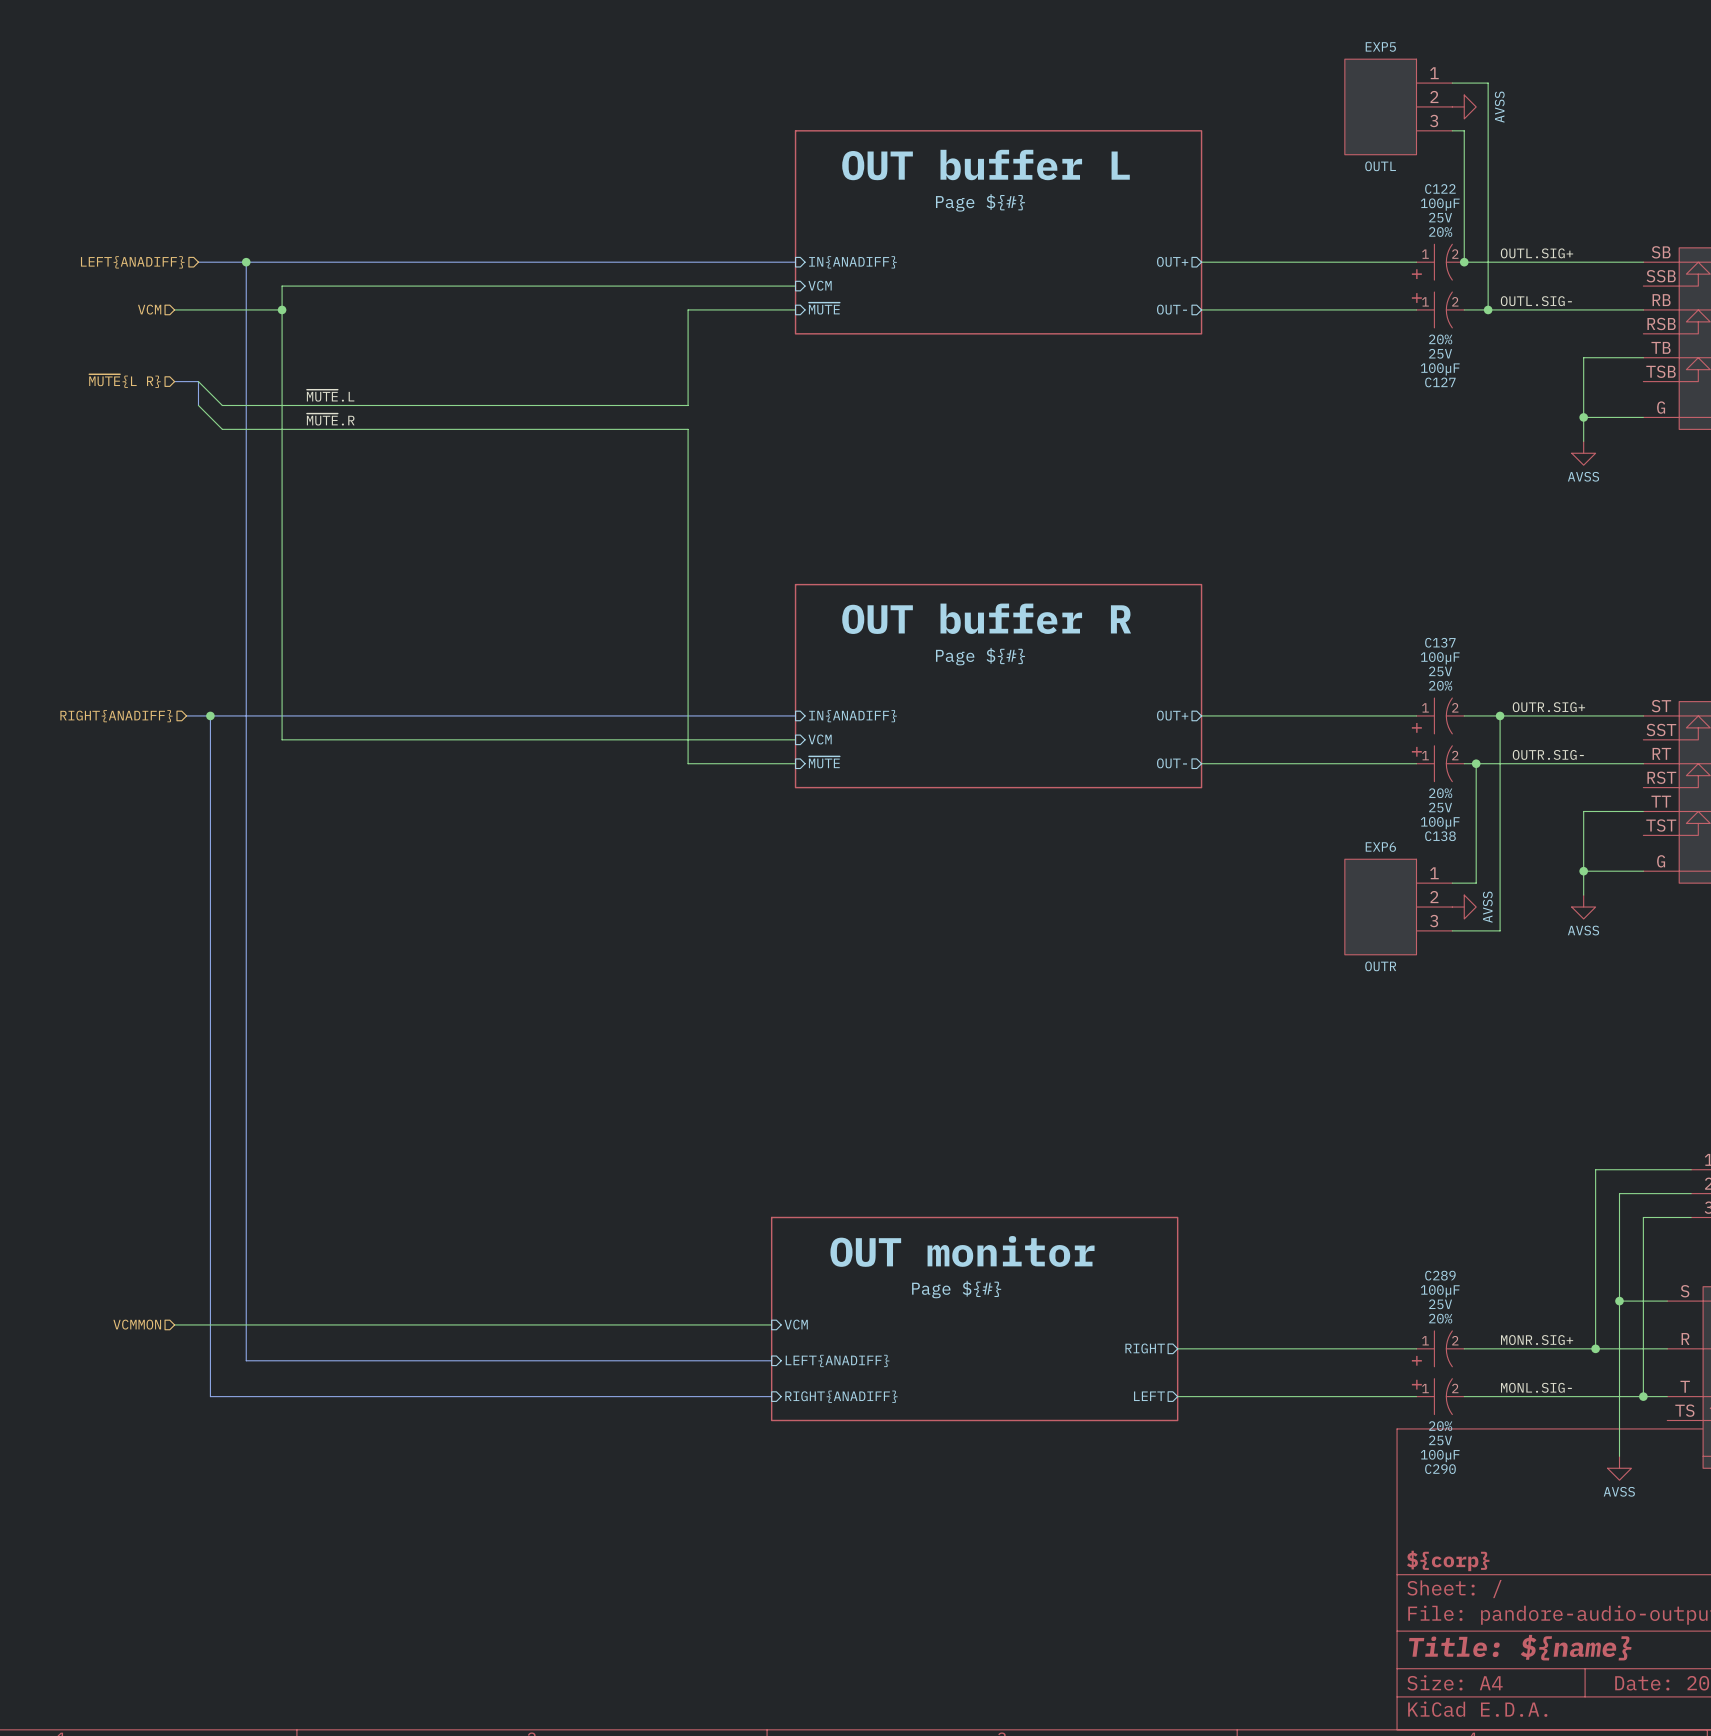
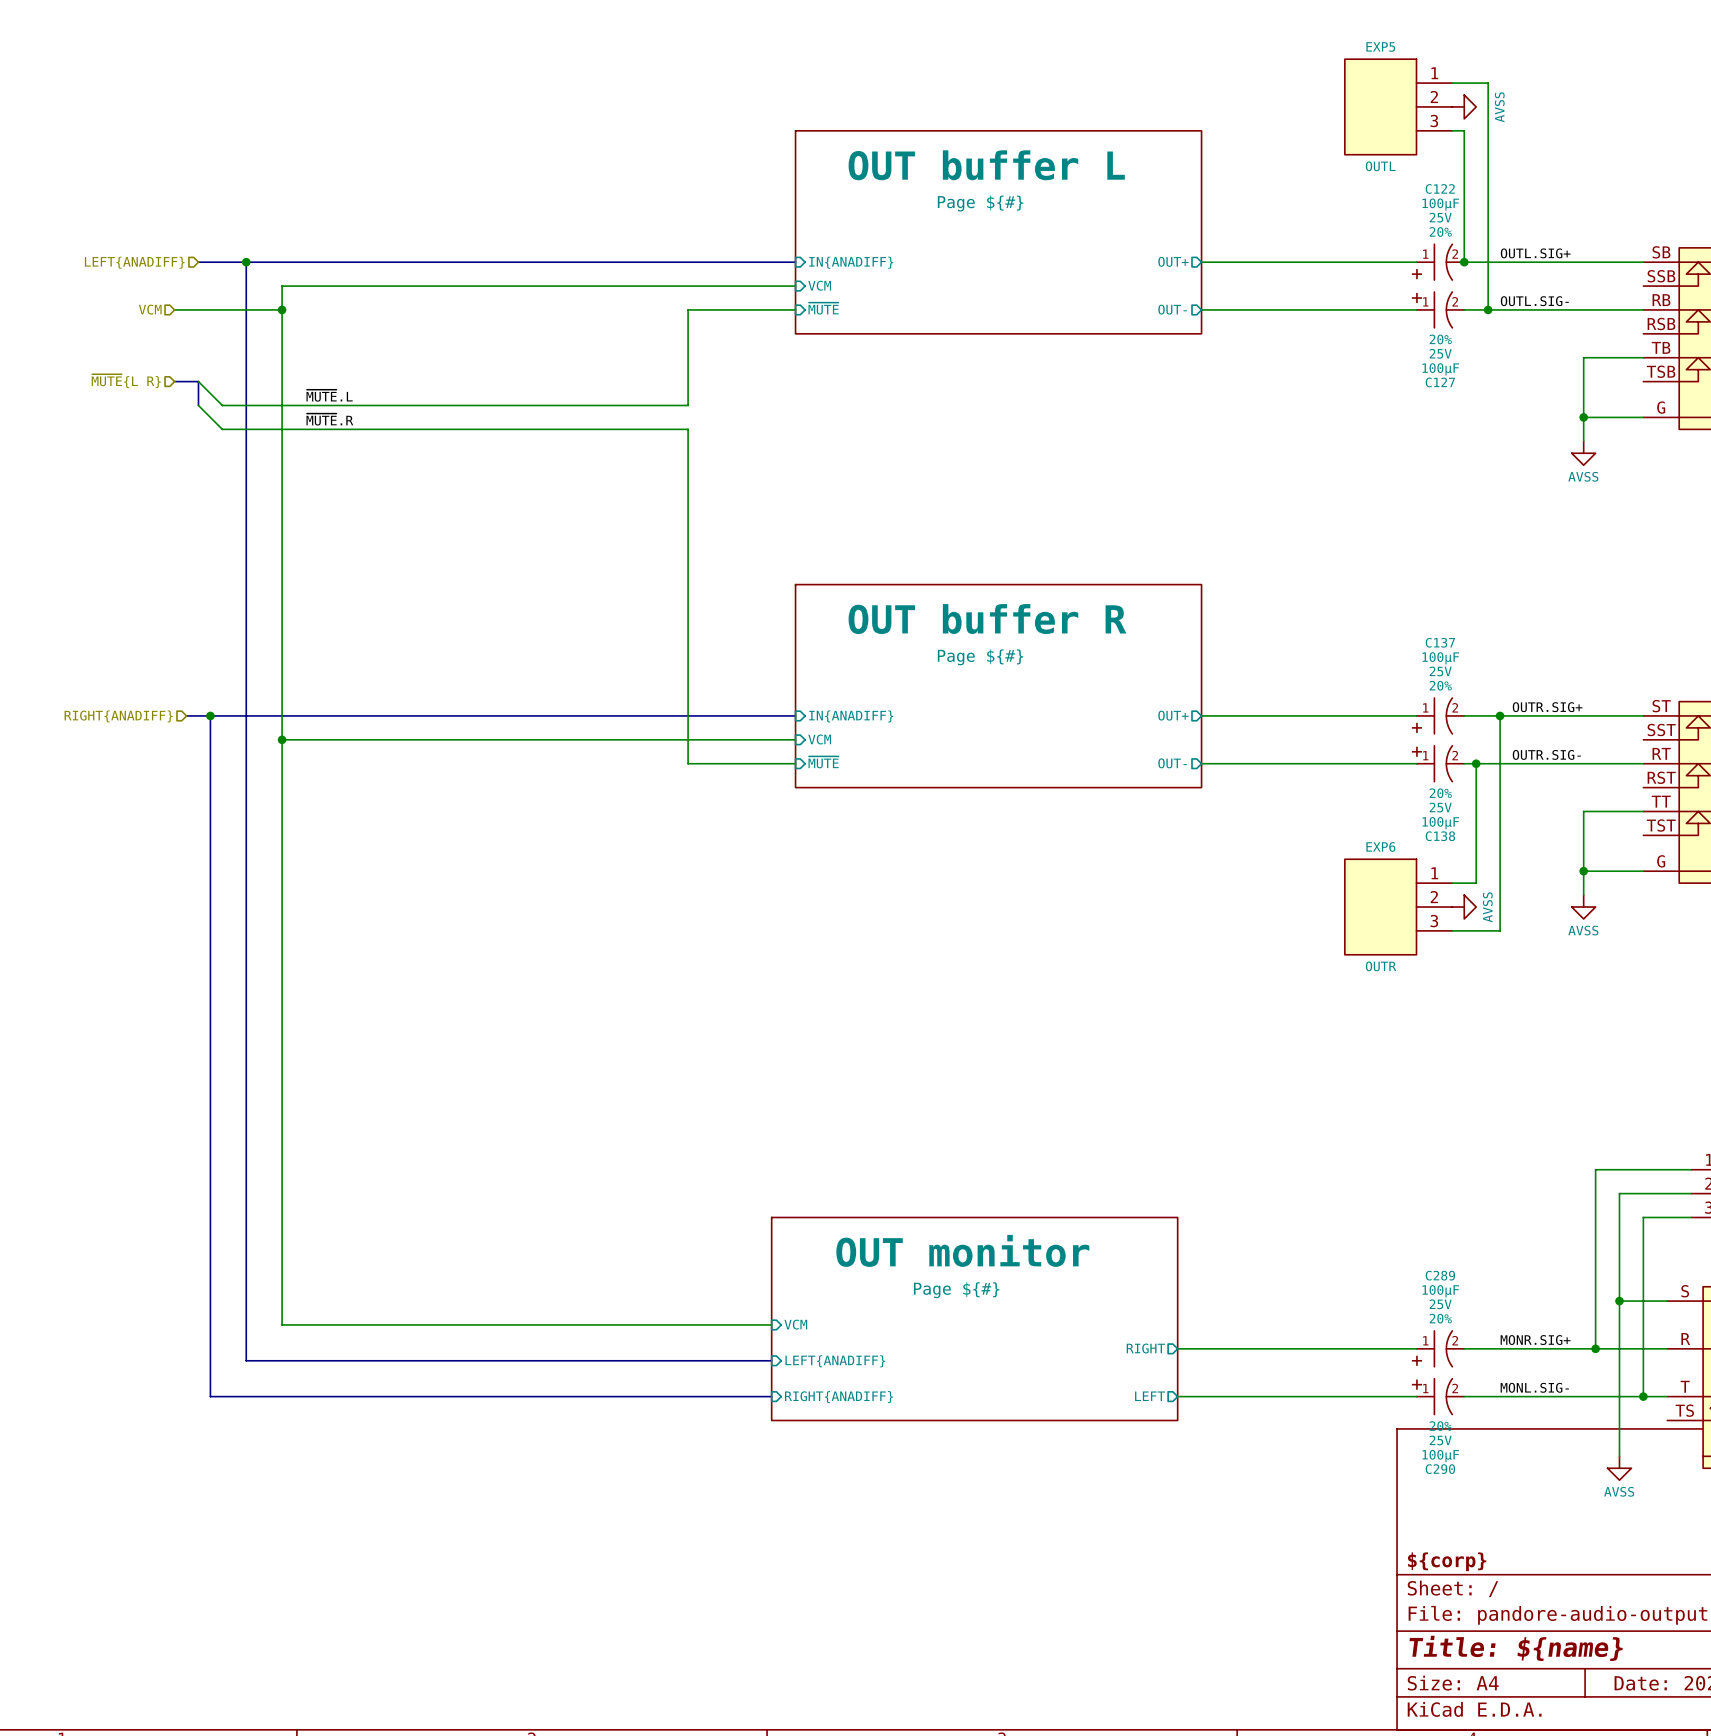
junction: none -> (282, 739)
hierarchical label: VCMMON (137, 1324) -> none
wire: (174, 1324) (282, 1324) -> (282, 739) (282, 1324)

